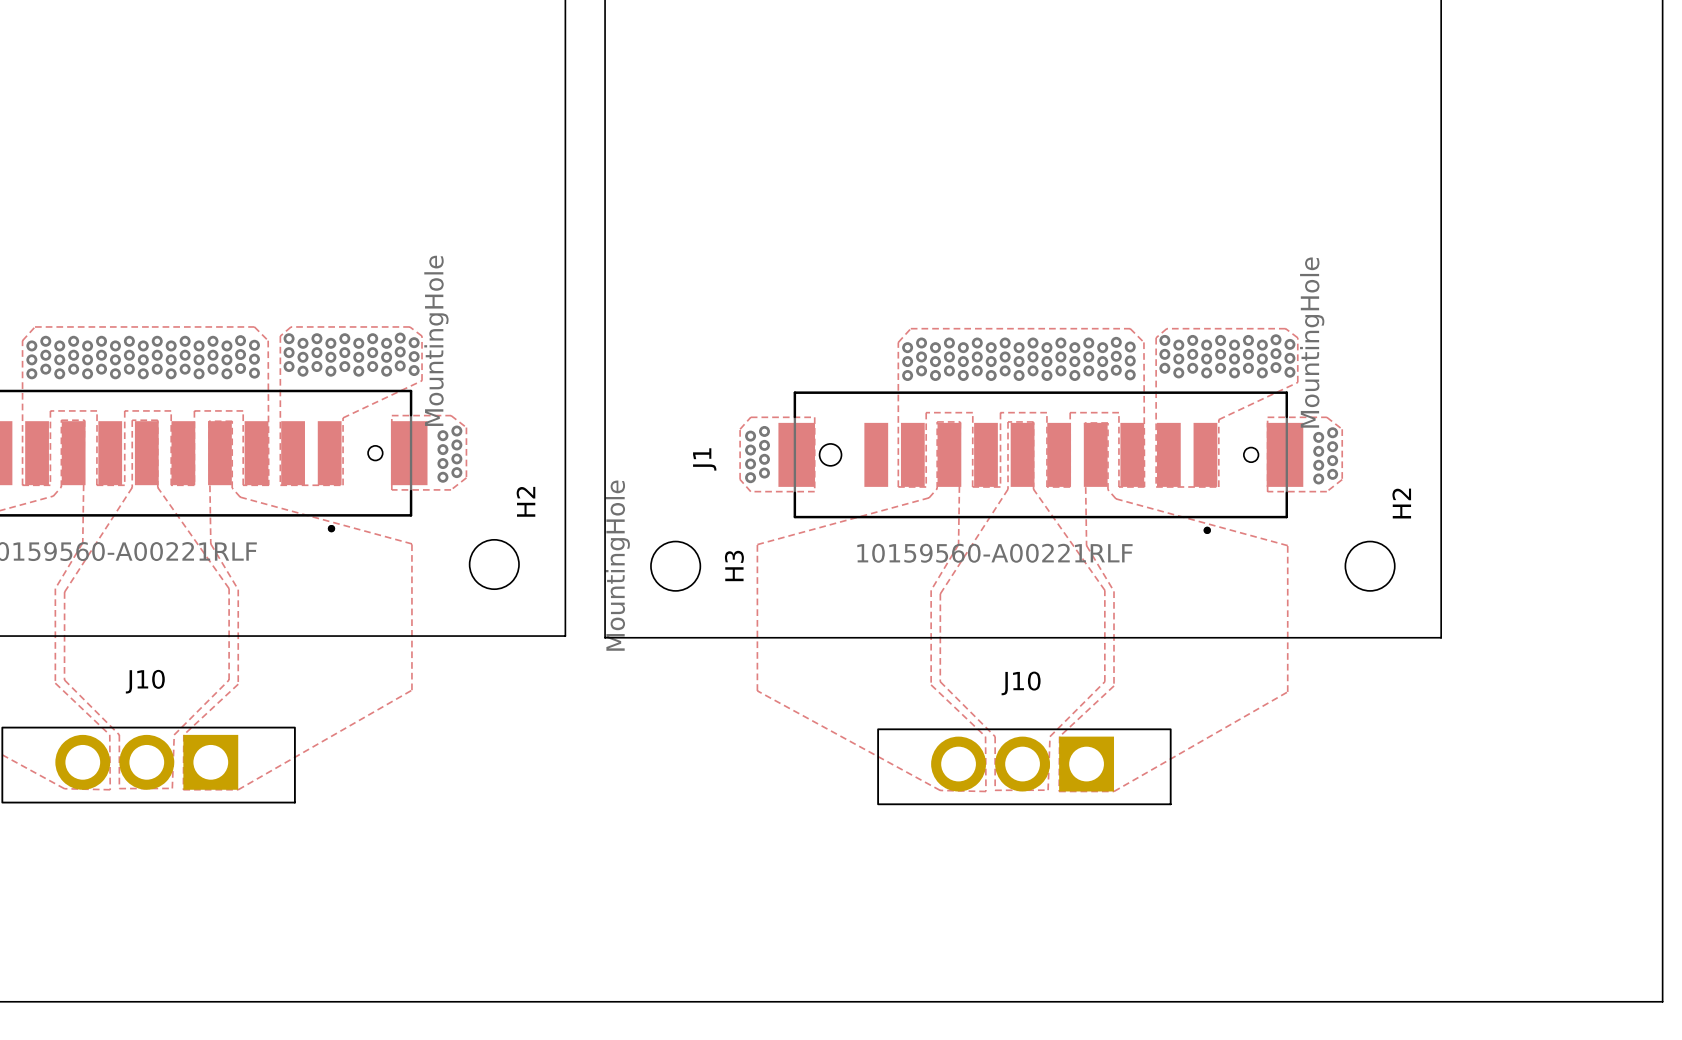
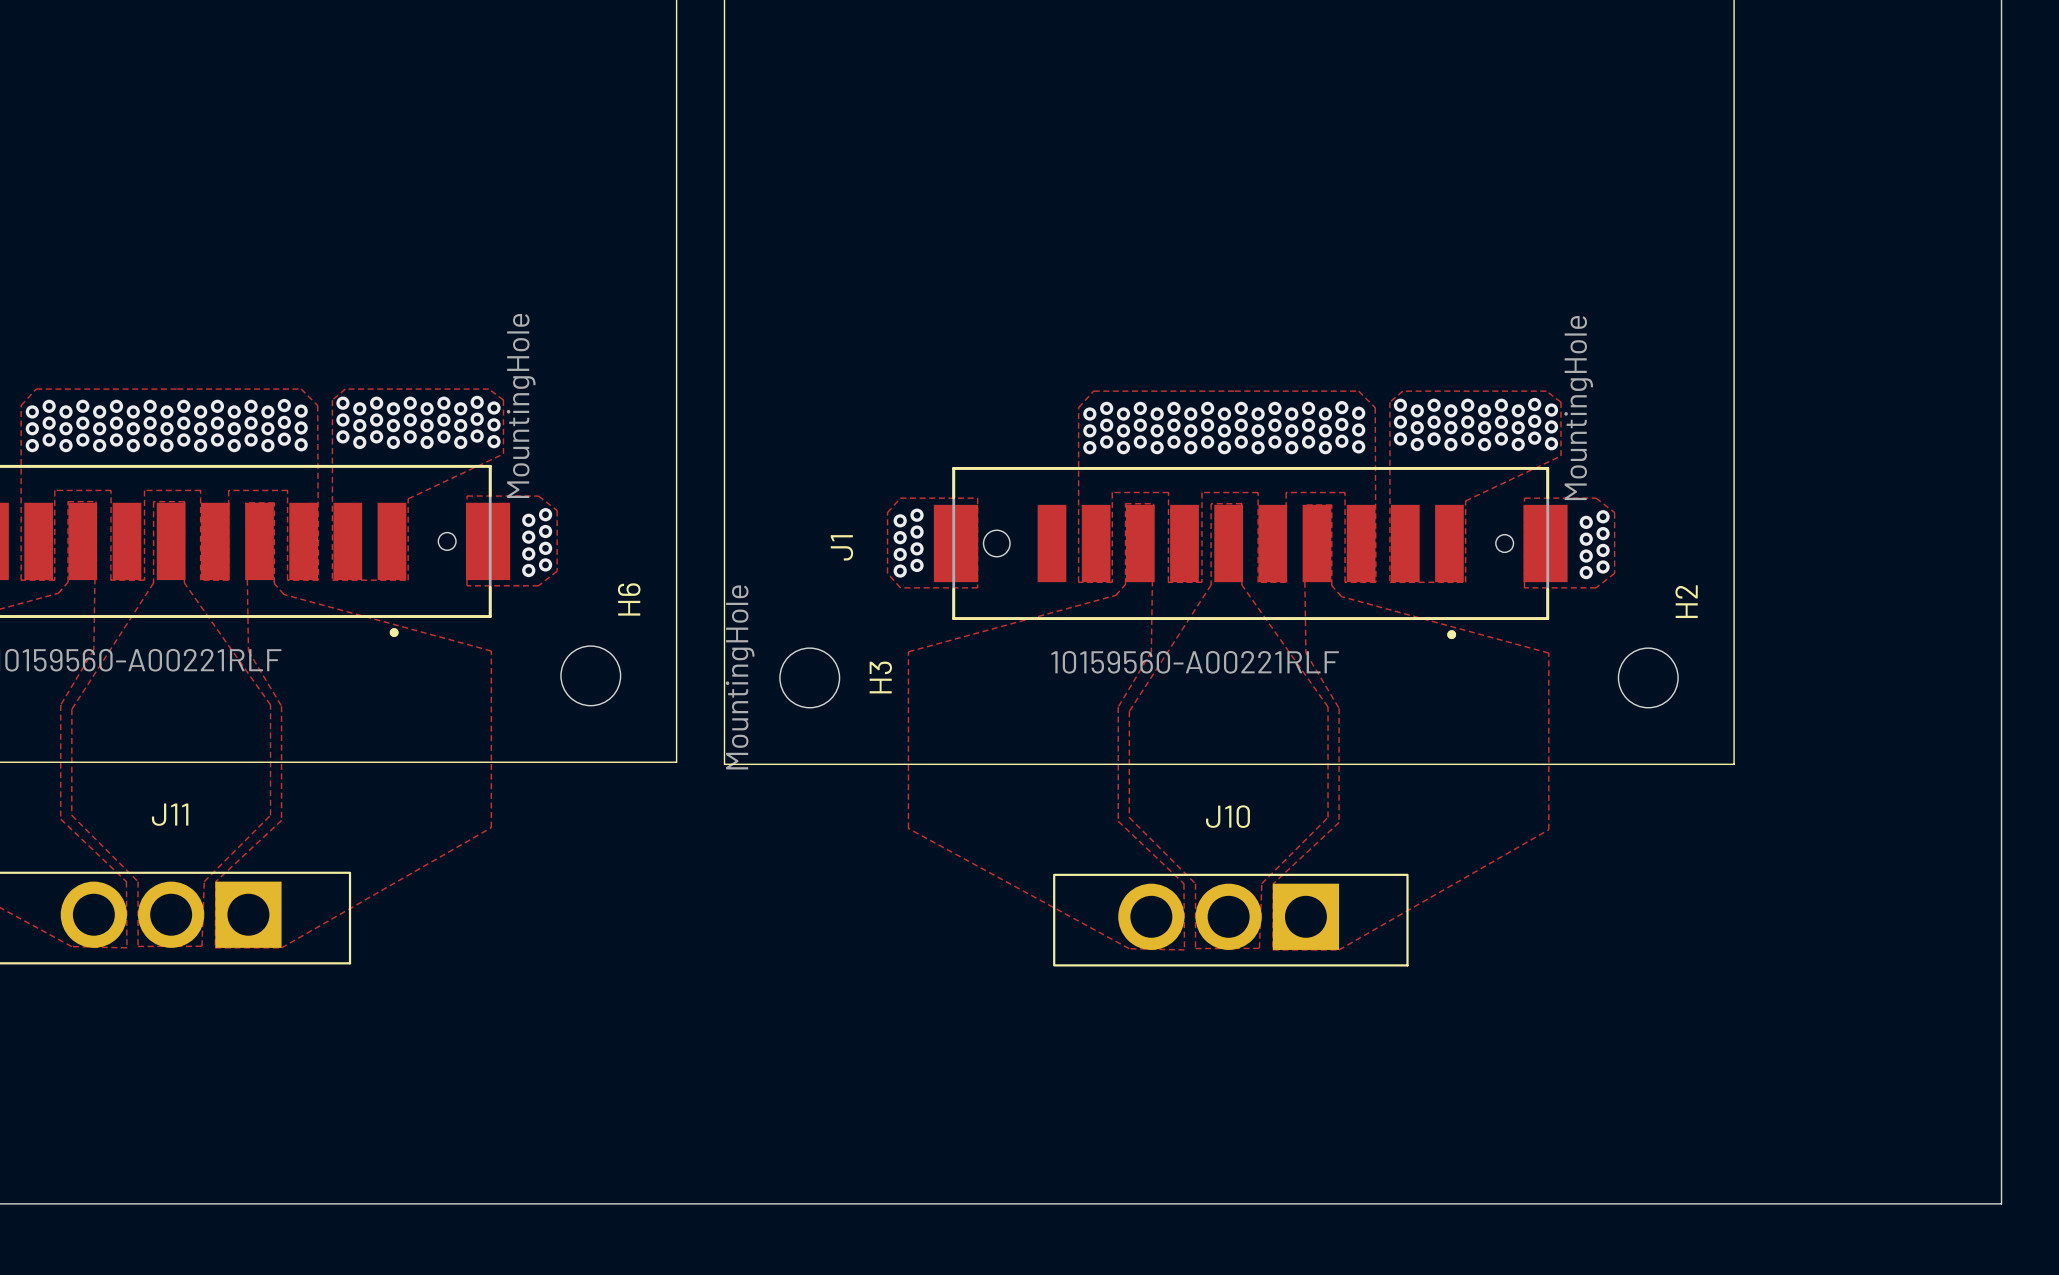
H2 name: H2 (525, 501) -> H6 (629, 599)
J10 name: J10 (145, 681) -> J11 (170, 814)

